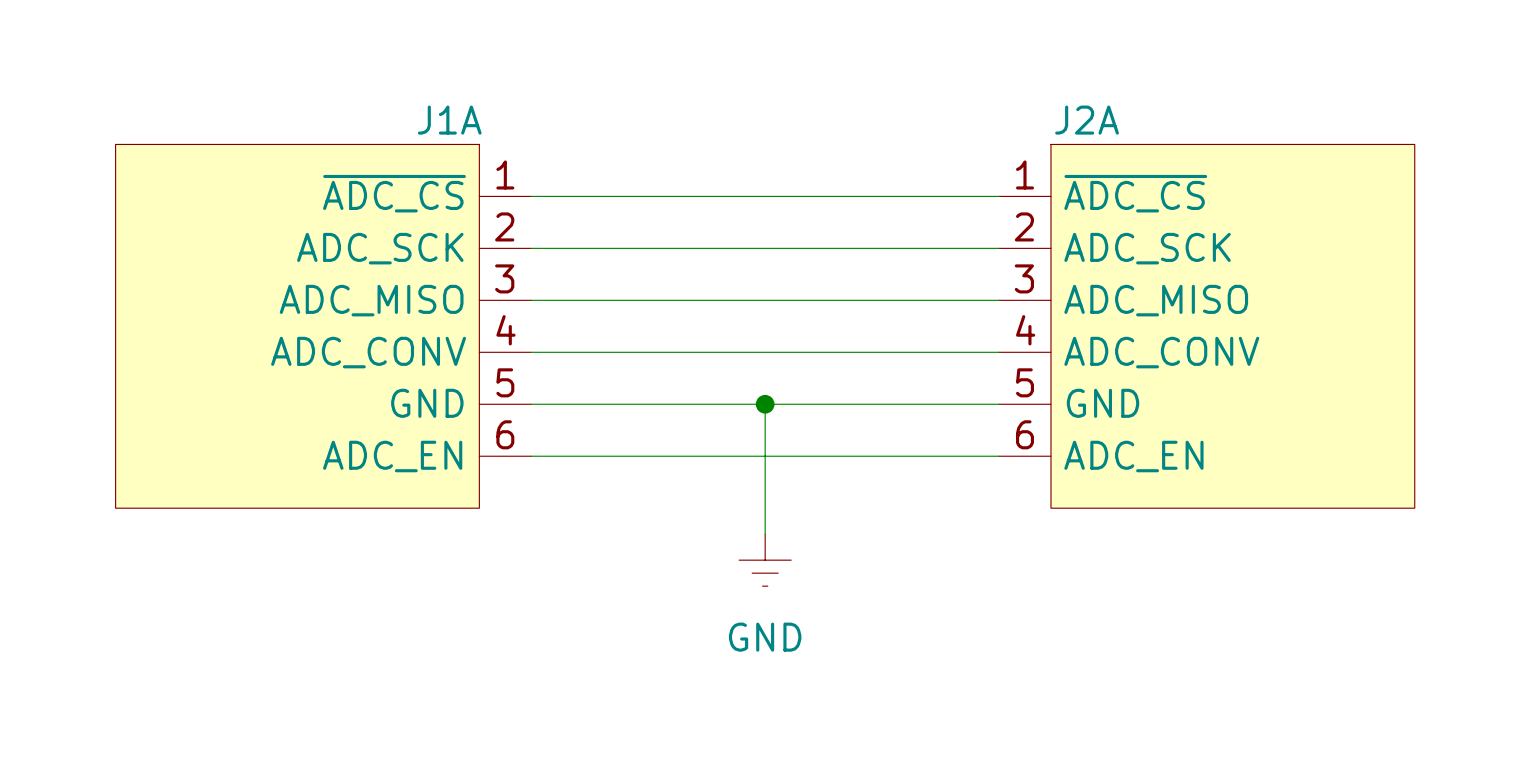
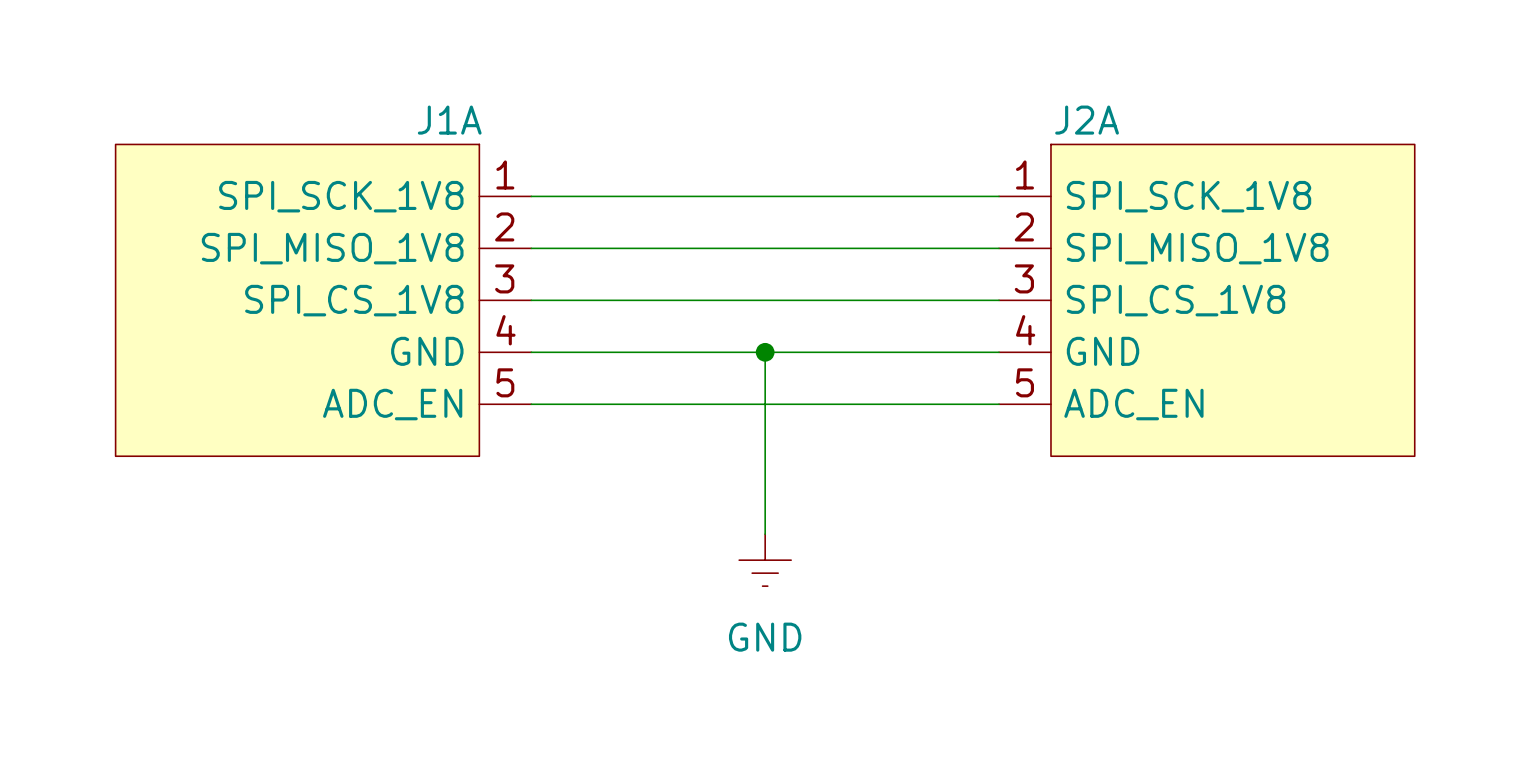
J1A symbol: [115, 144, 532, 509] -> [115, 144, 532, 457]
J2A symbol: [999, 144, 1415, 509] -> [999, 144, 1415, 457]
wire: none -> (765, 352) (765, 404)
junction position: (765, 404) -> (765, 352)
wire: (531, 456) (999, 456) -> none

